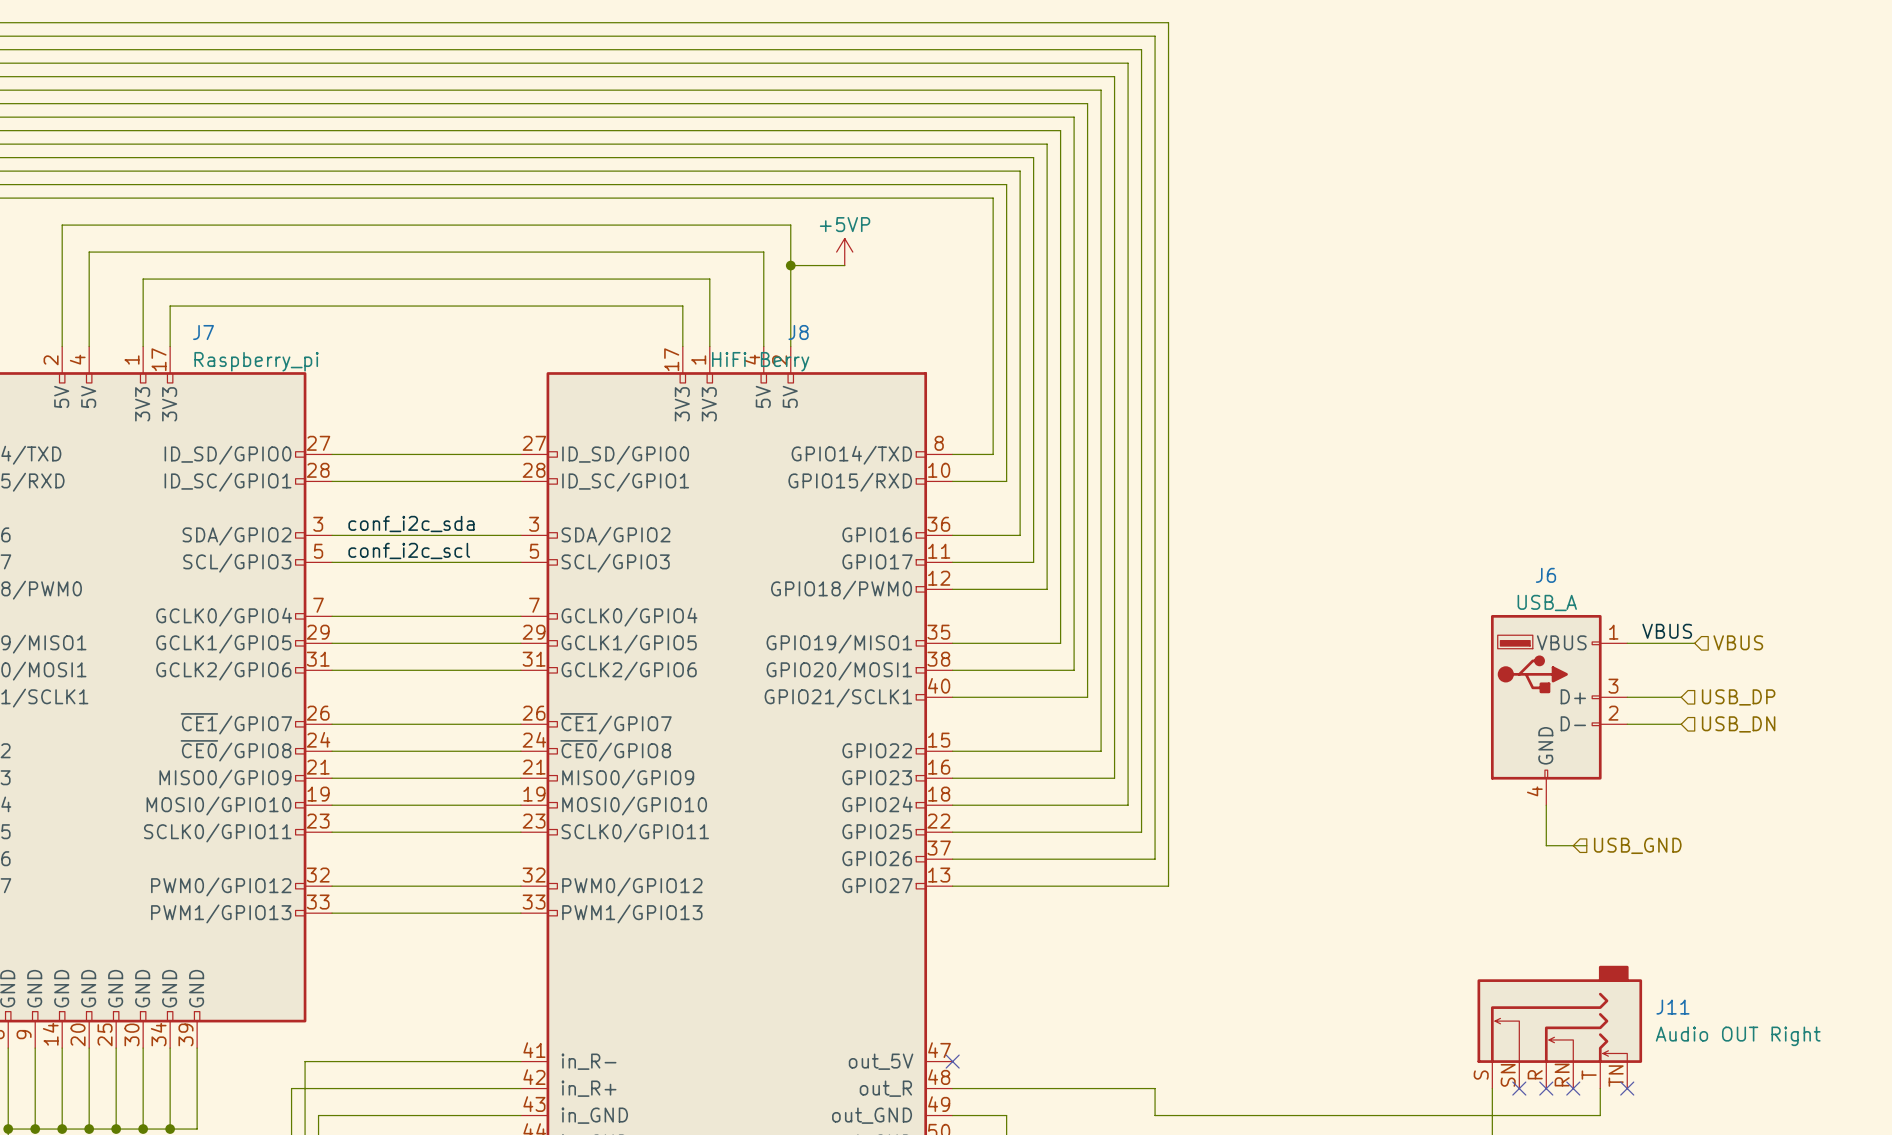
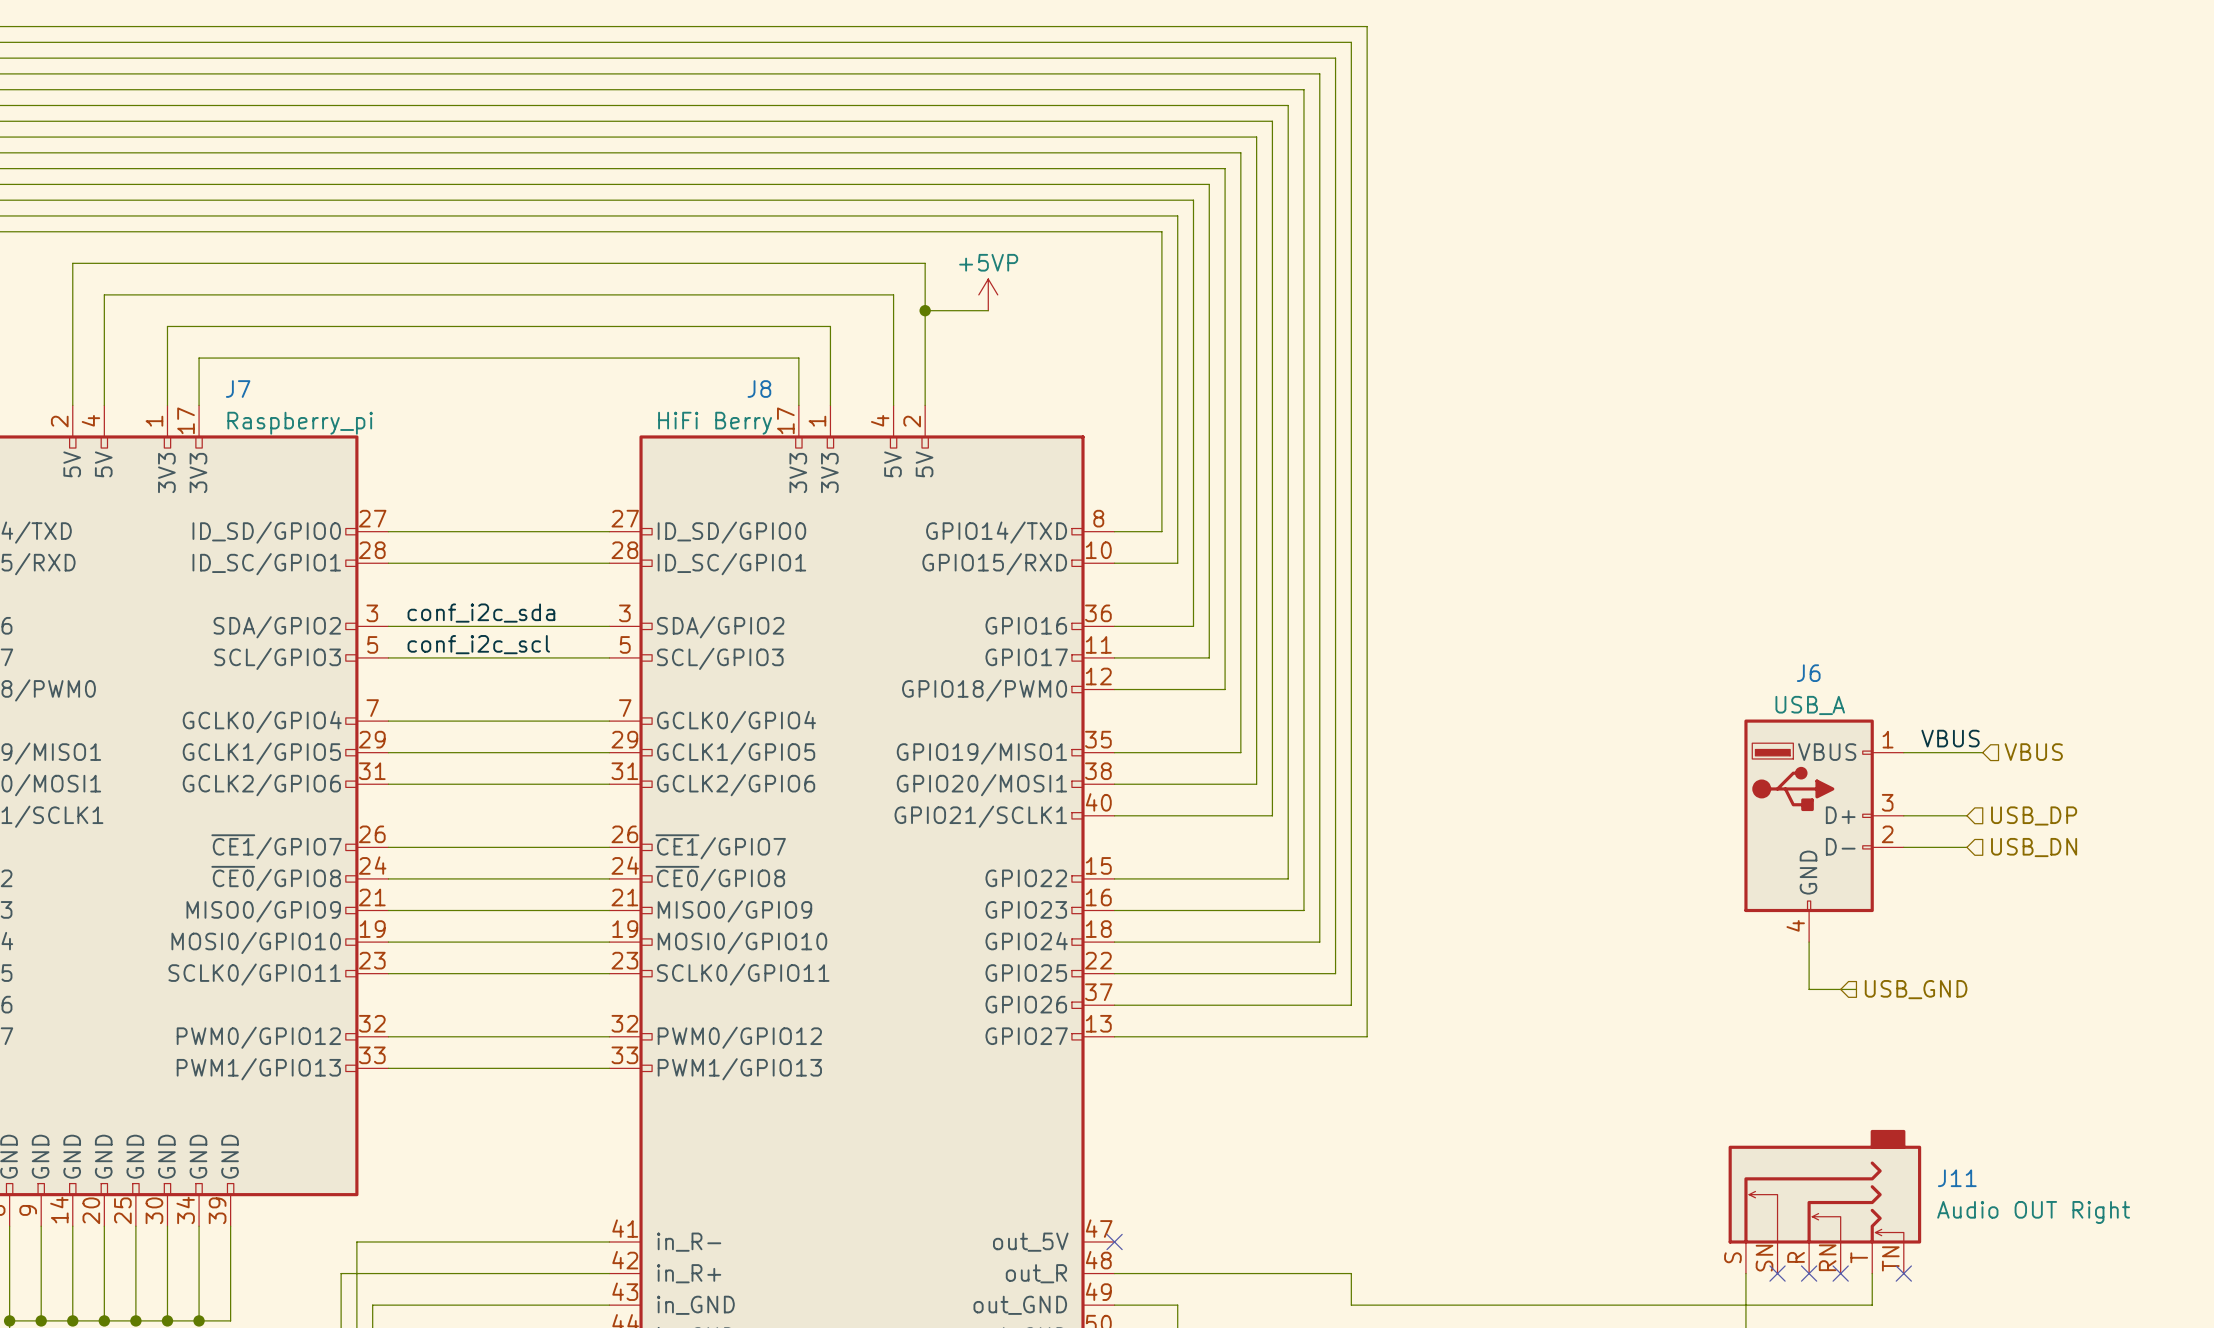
J8 name position: J8 (798, 332) -> J8 (759, 389)
J8 value position: HiFi Berry (760, 361) -> HiFi Berry (715, 423)

